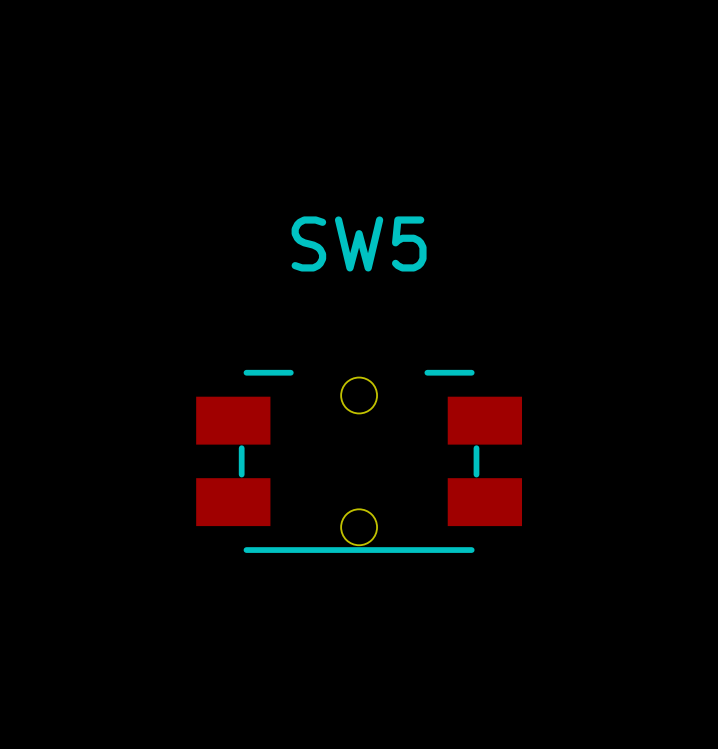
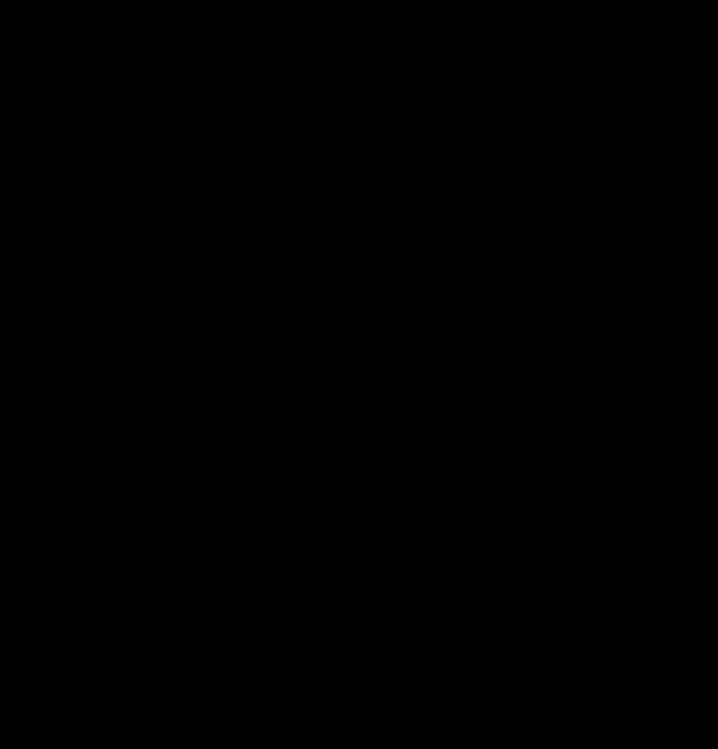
SW5: (359, 461) -> none

